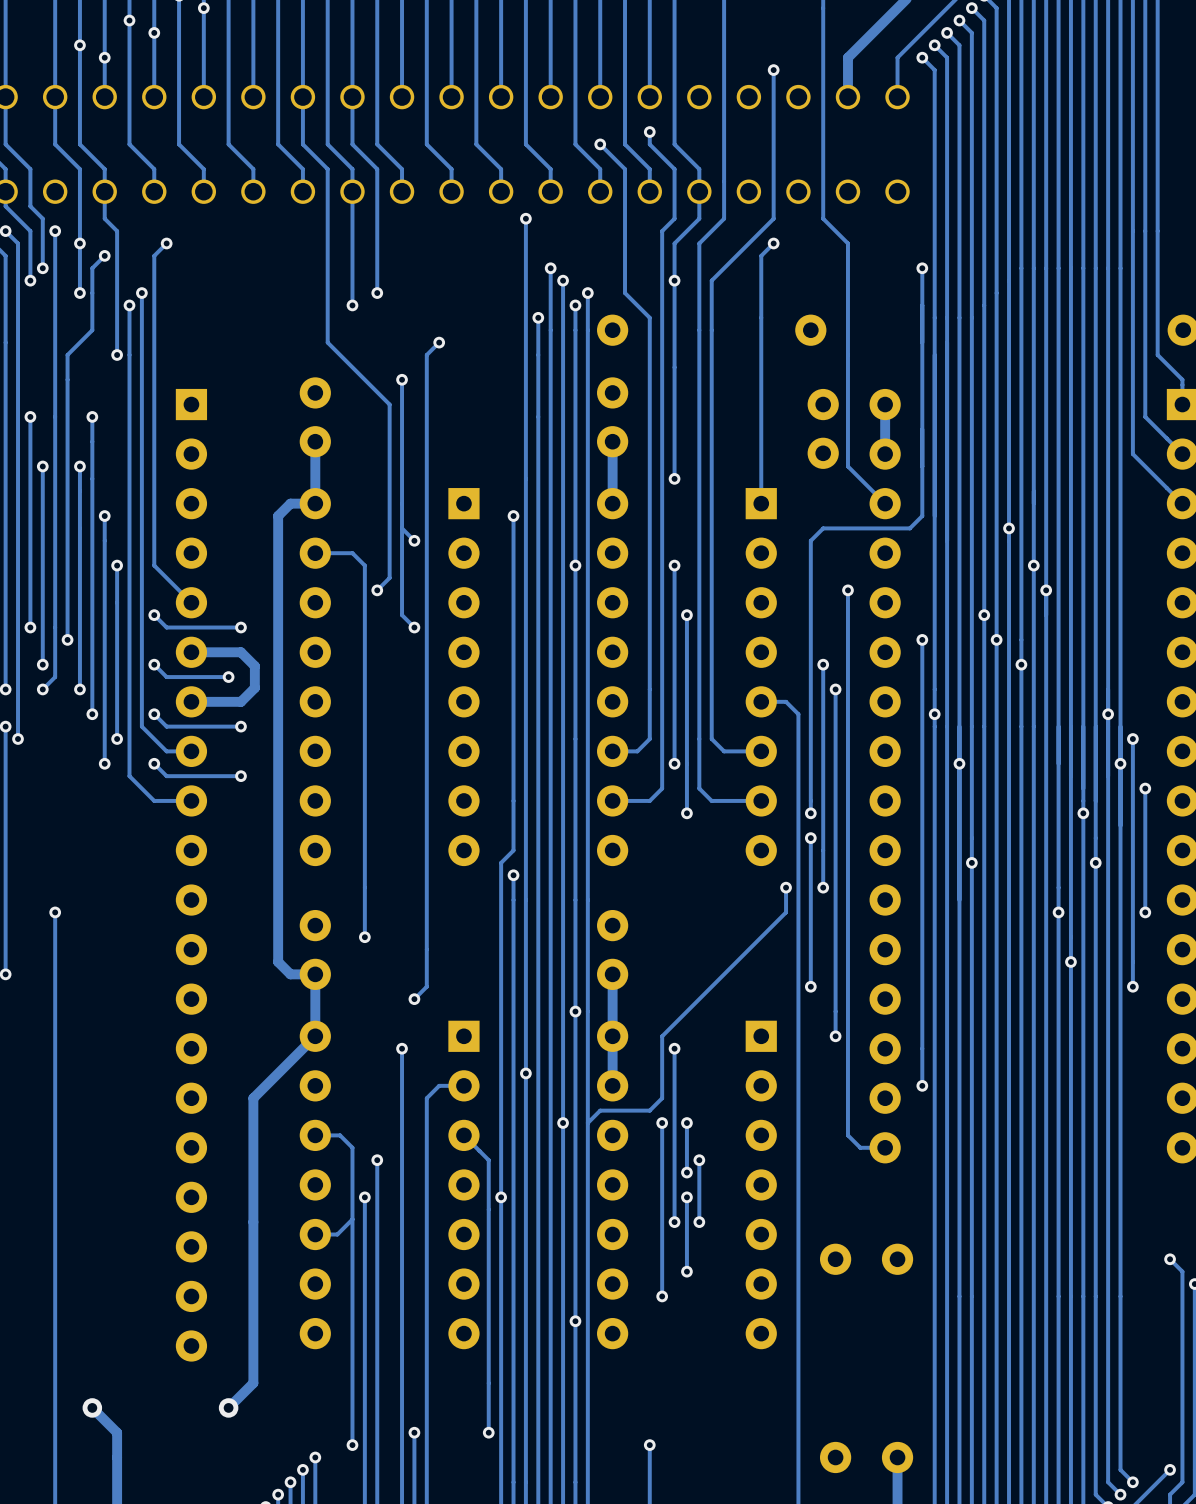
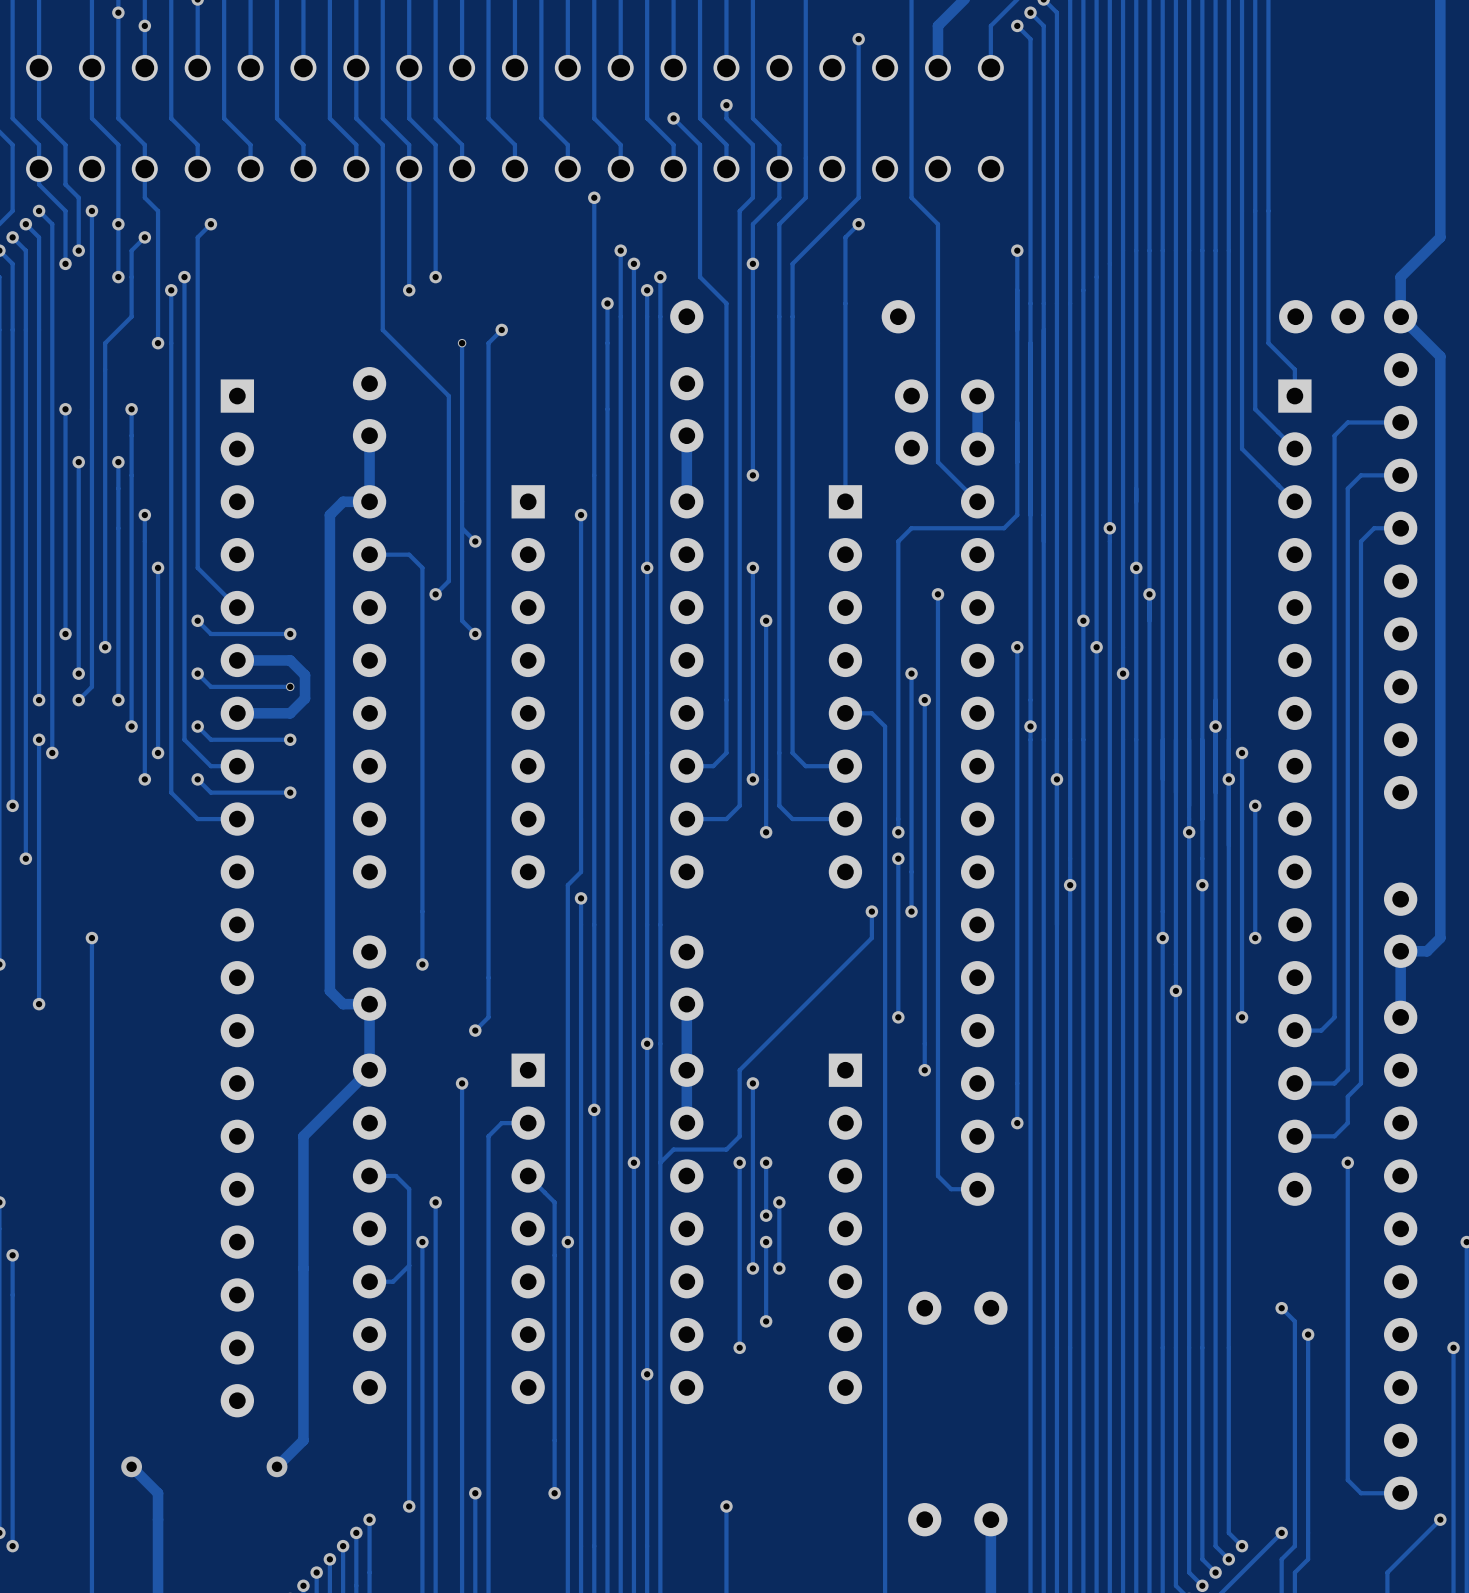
track: none -> (462, 343) (462, 369)
via: none -> (462, 343)
via: (402, 379) -> none
via: (228, 677) -> none
track: none -> (290, 686) (277, 686)
via: none -> (290, 686)

